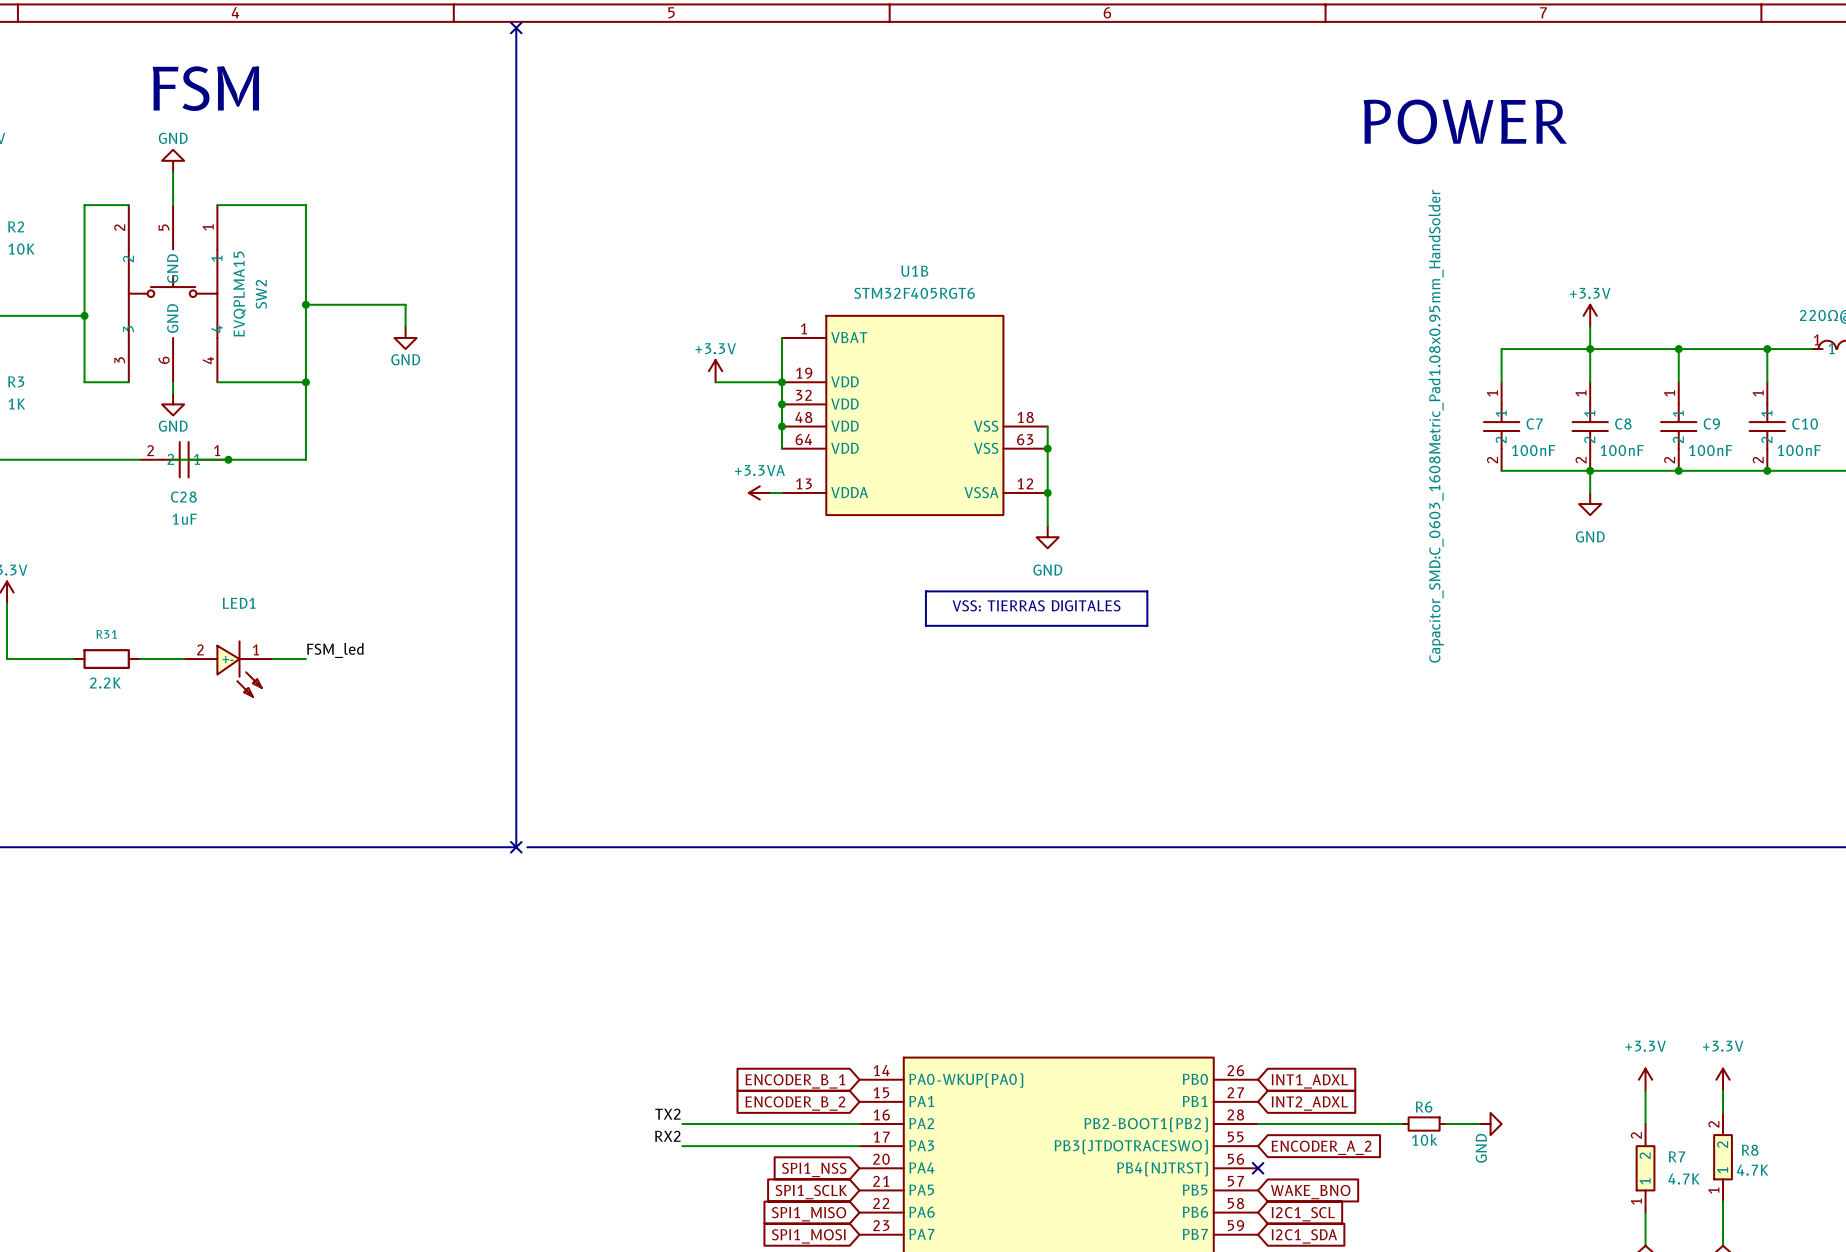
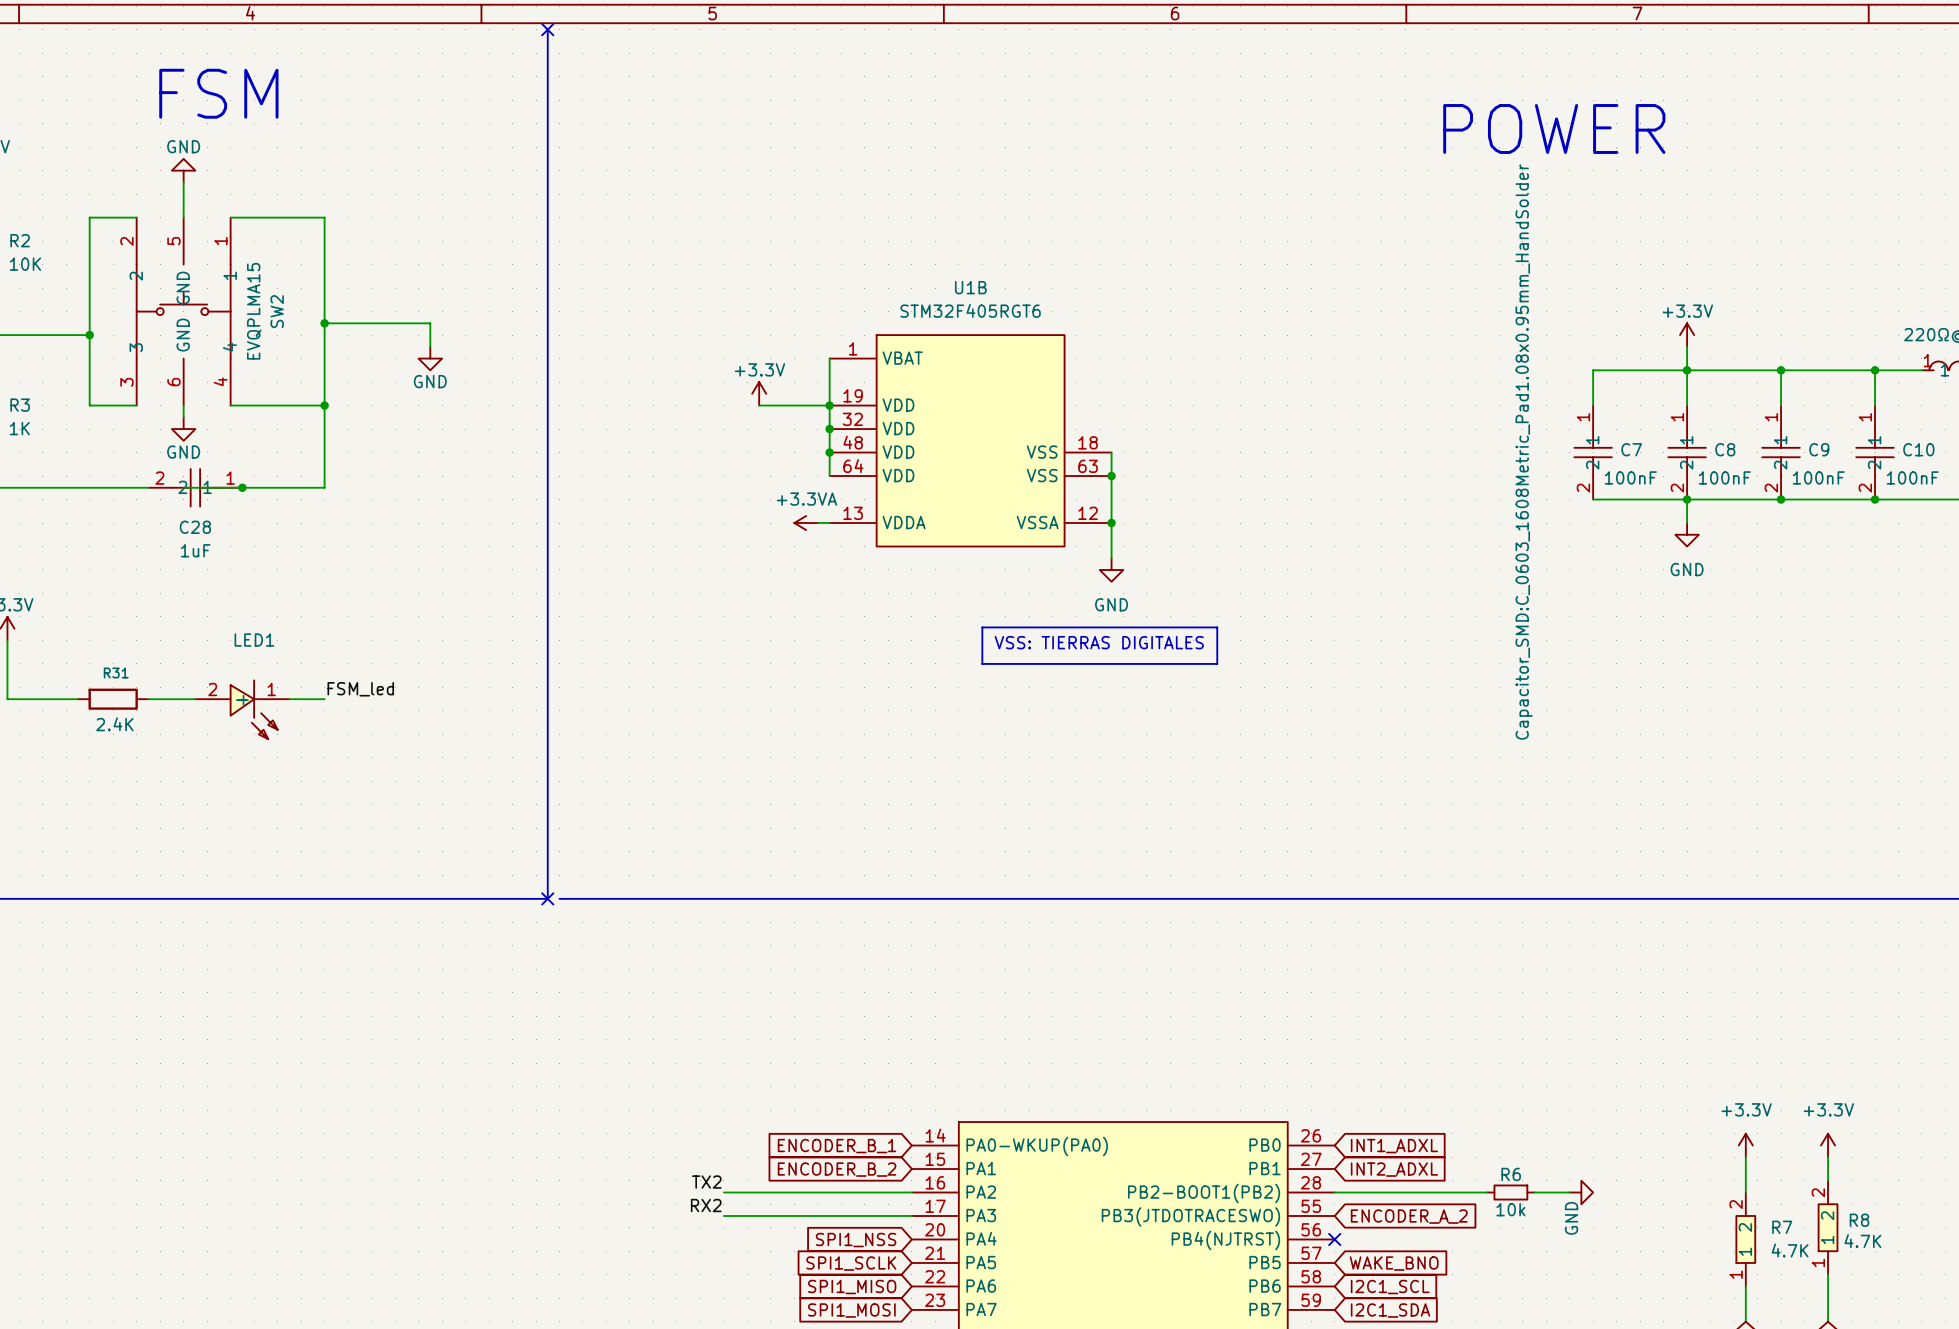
R31 value: 2.2K (105, 683) -> 2.4K (114, 724)

